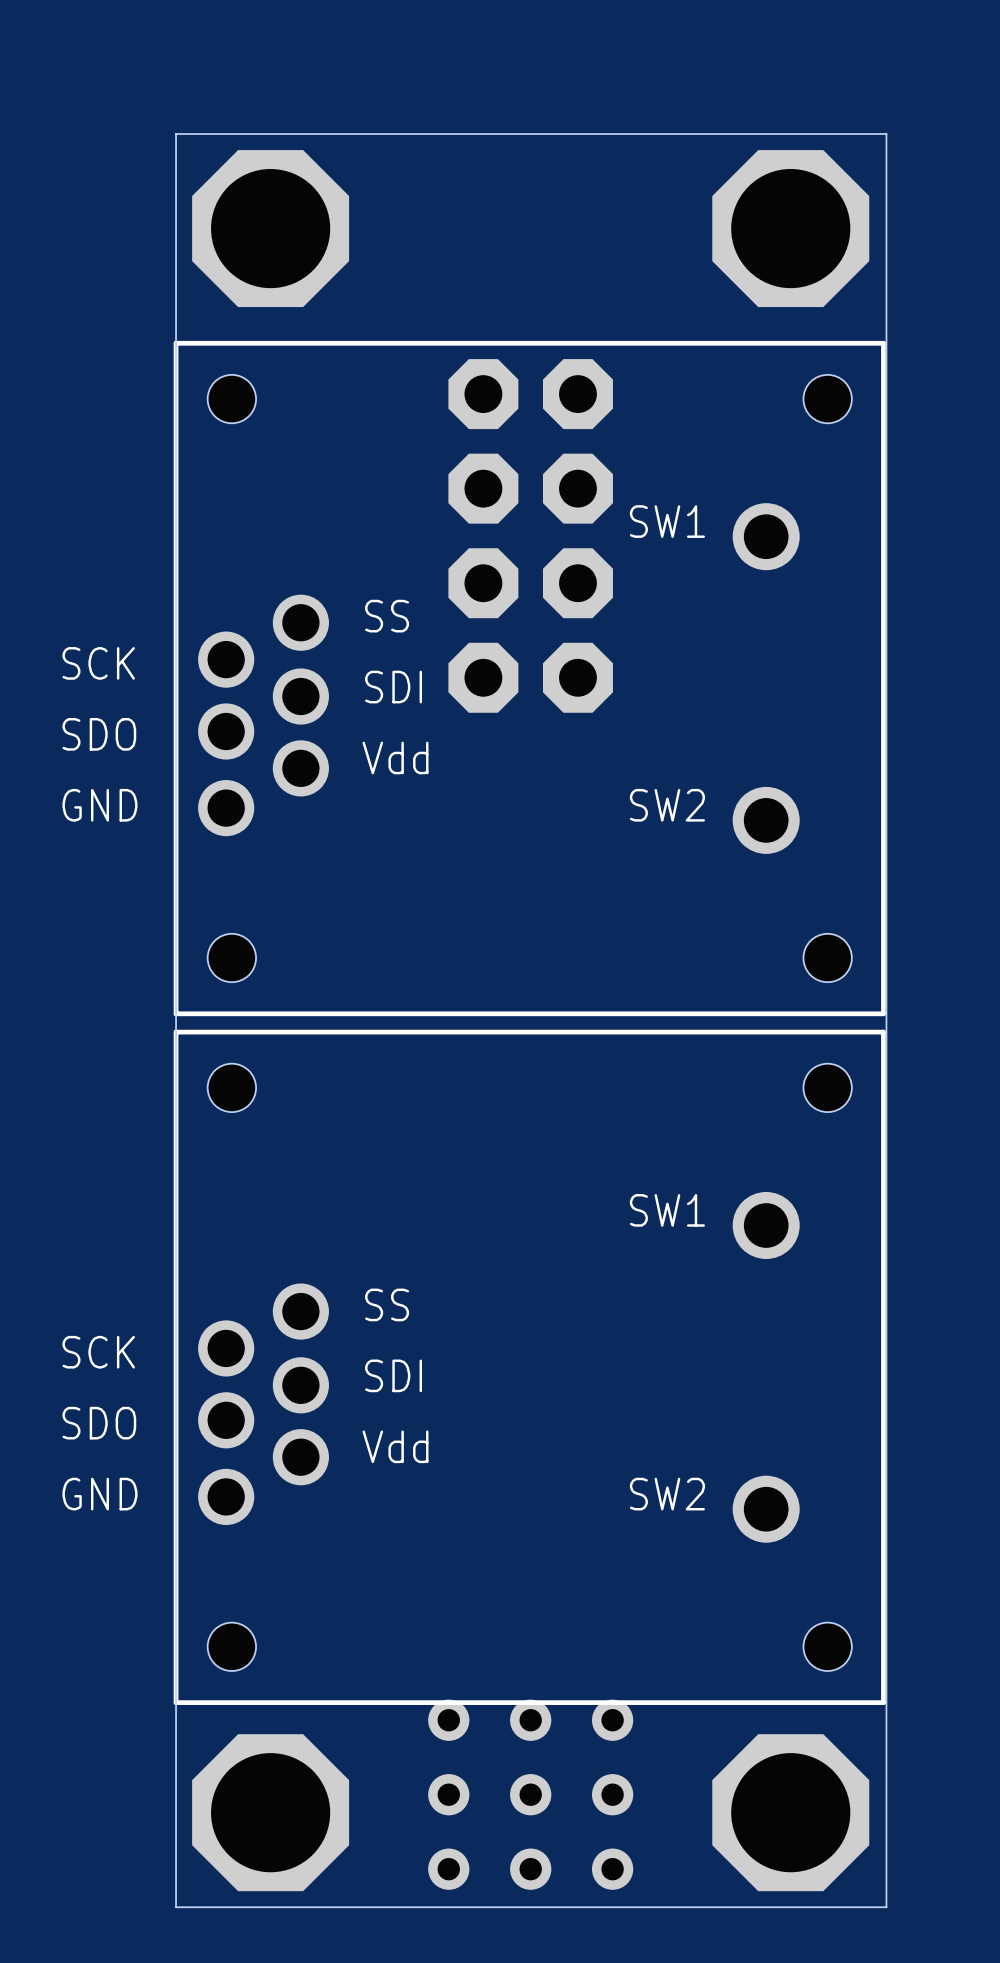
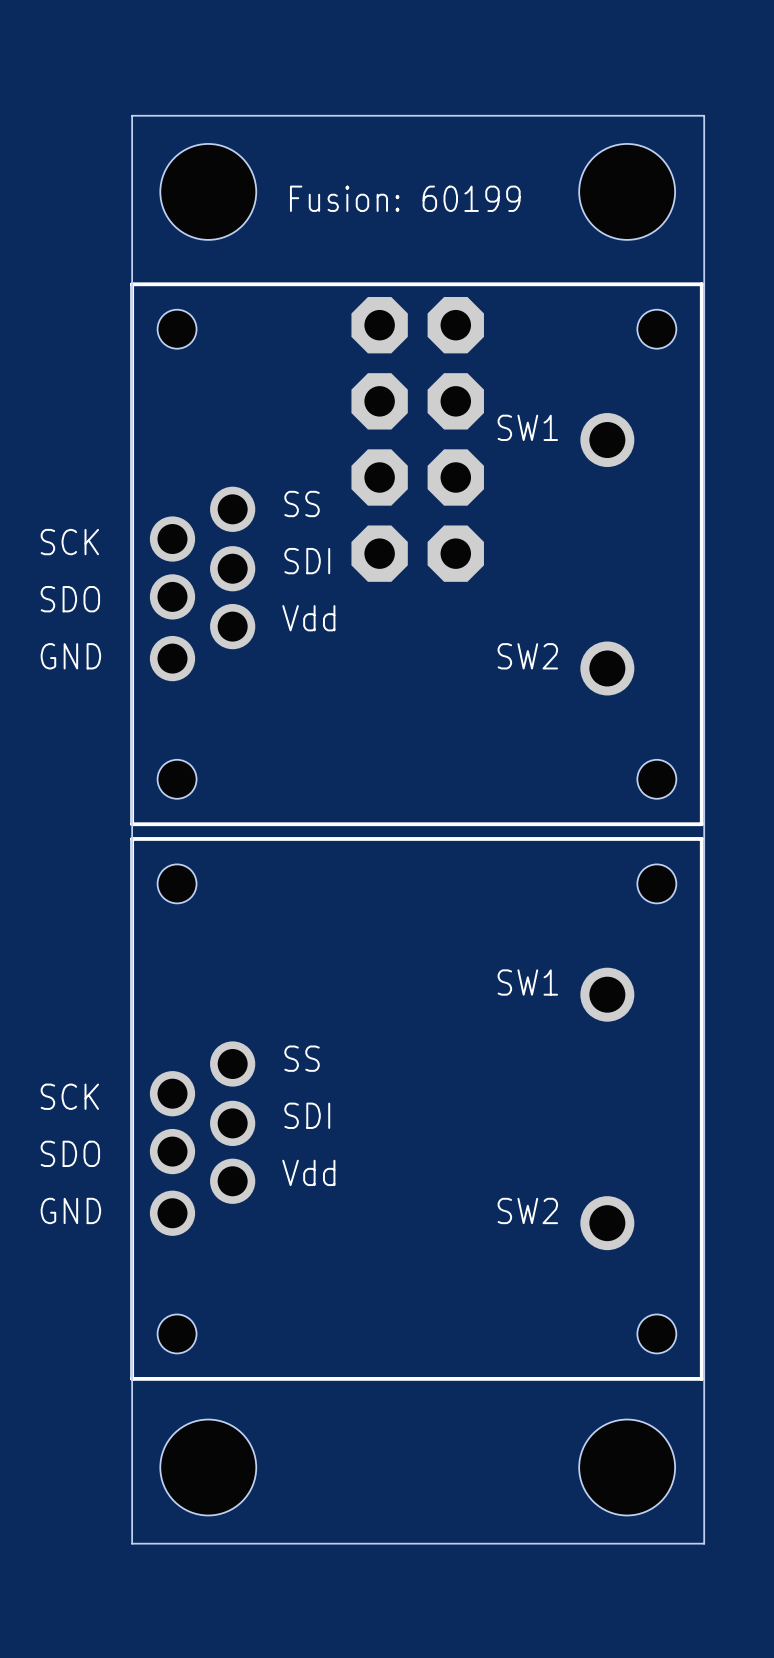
part: (270, 228) -> none
hole: none -> (208, 191)
part: (790, 228) -> none
hole: none -> (627, 191)
text: none -> Fusion: 60199 (405, 198)
part: (530, 1794) -> none
part: (270, 1812) -> none
hole: none -> (208, 1467)
part: (790, 1812) -> none
hole: none -> (627, 1467)

